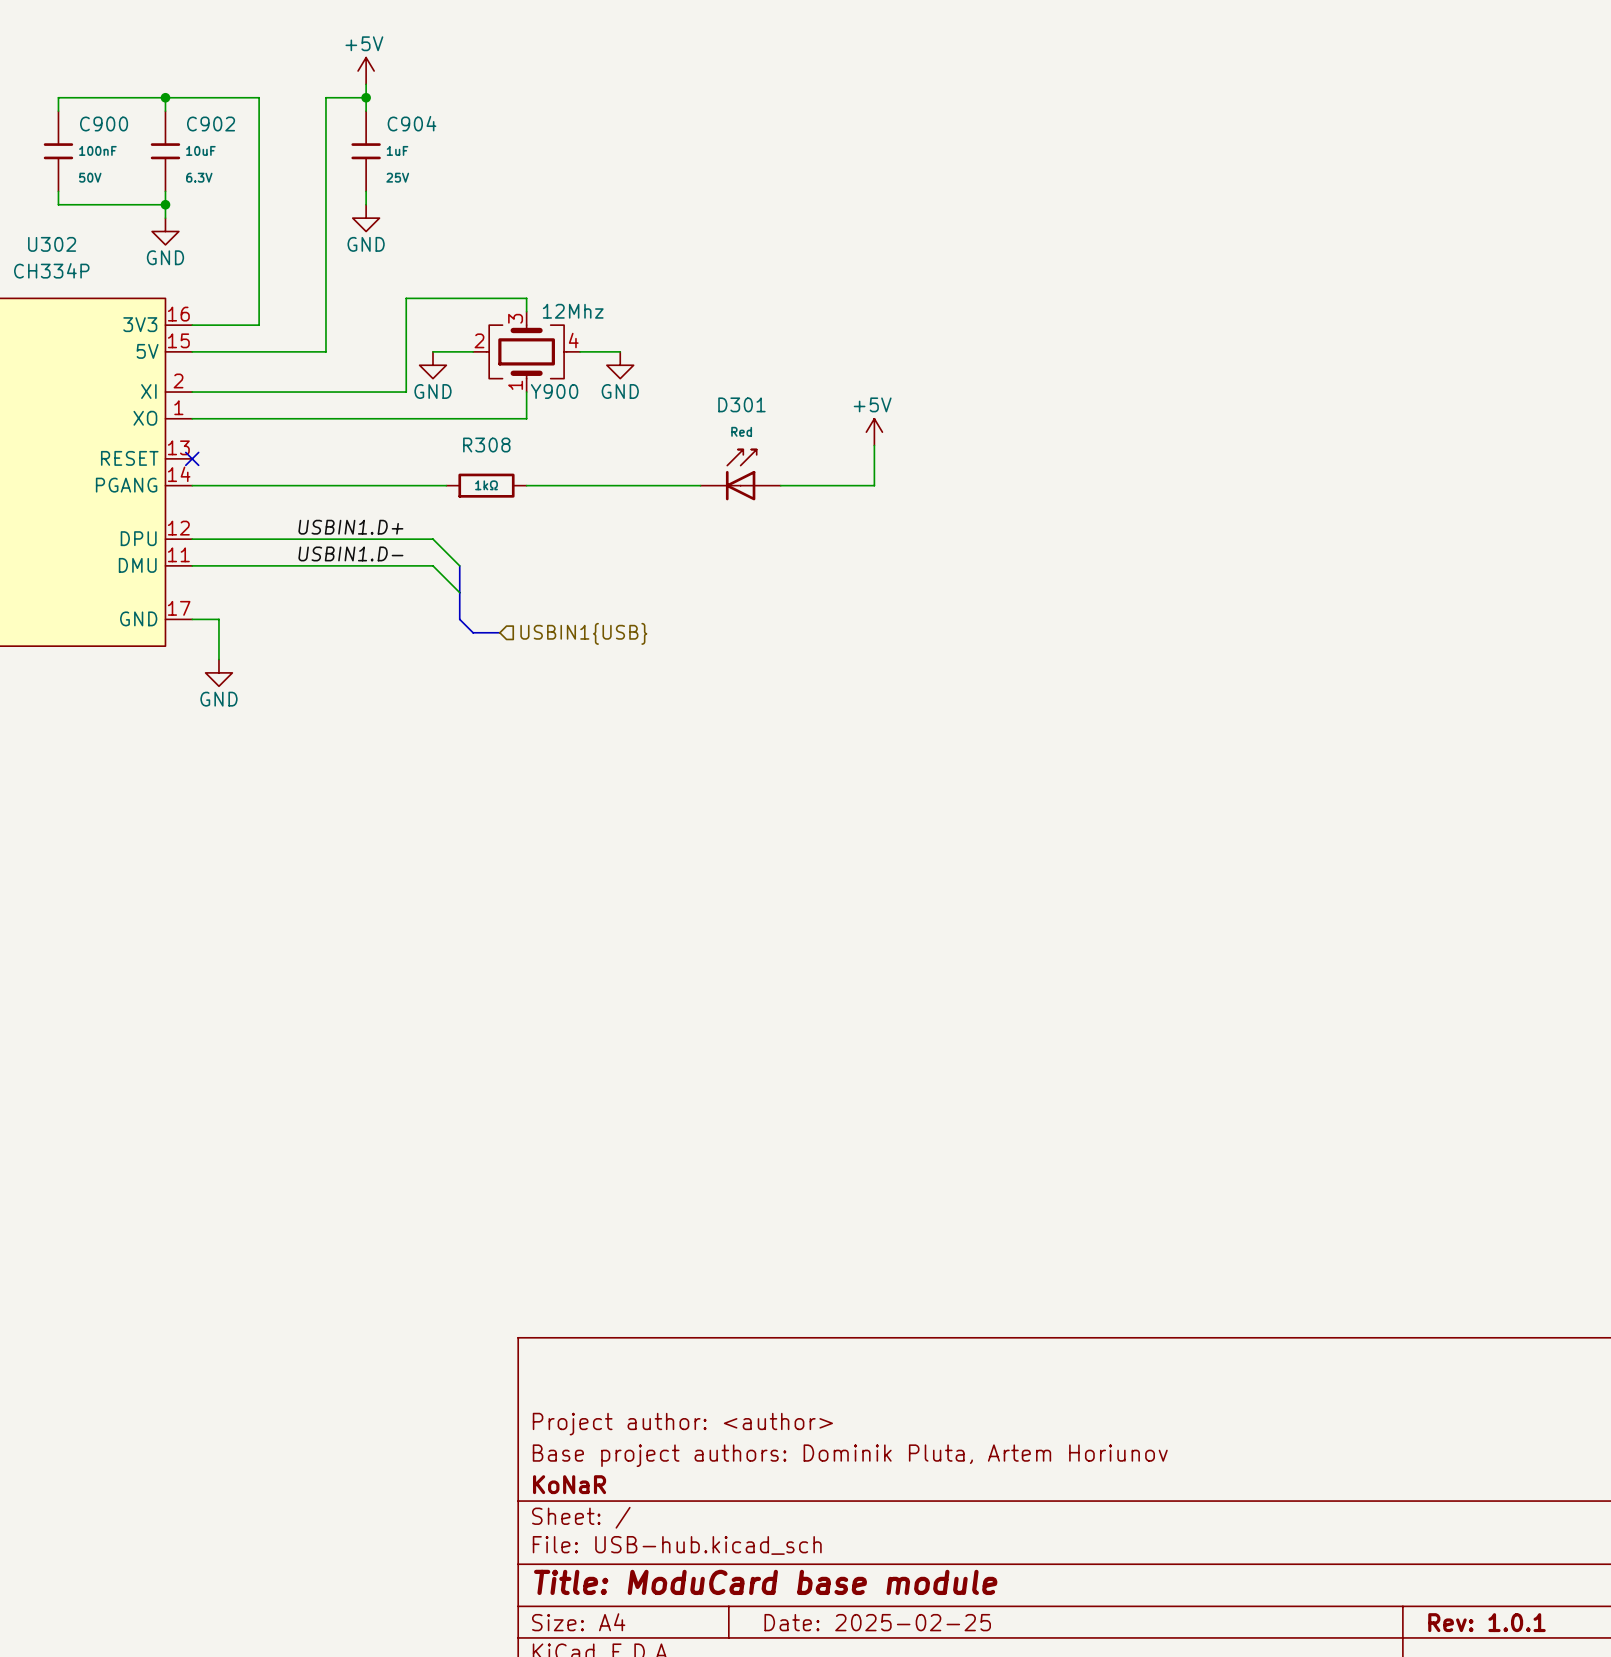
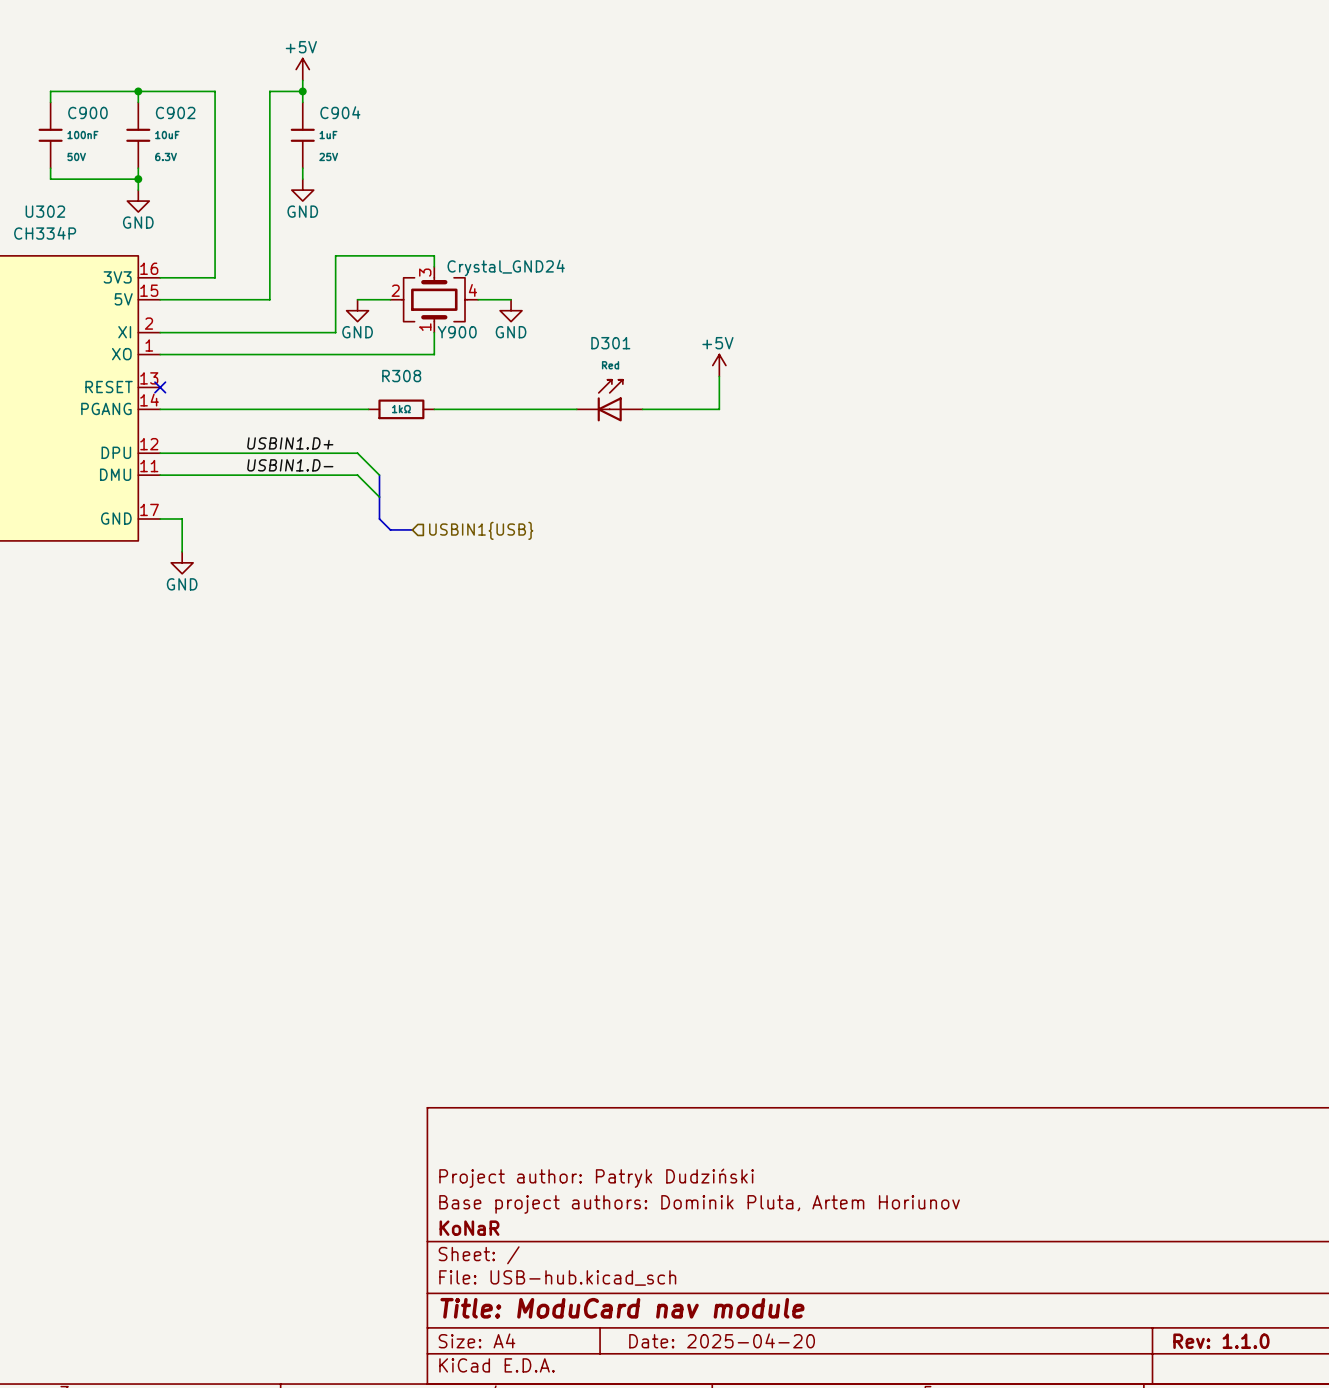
Y900 value: 12Mhz (573, 311) -> Crystal_GND24 (506, 268)
title block: Project author: <author> (682, 1424) -> Project author: Patryk Dudziński (596, 1178)
title block: Title: ModuCard base module (765, 1582) -> Title: ModuCard nav module (622, 1308)
title block: Date: 2025-02-25 (877, 1622) -> Date: 2025-04-20 (722, 1340)
title block: Rev: 1.0.1 (1486, 1622) -> Rev: 1.1.0 (1221, 1341)

